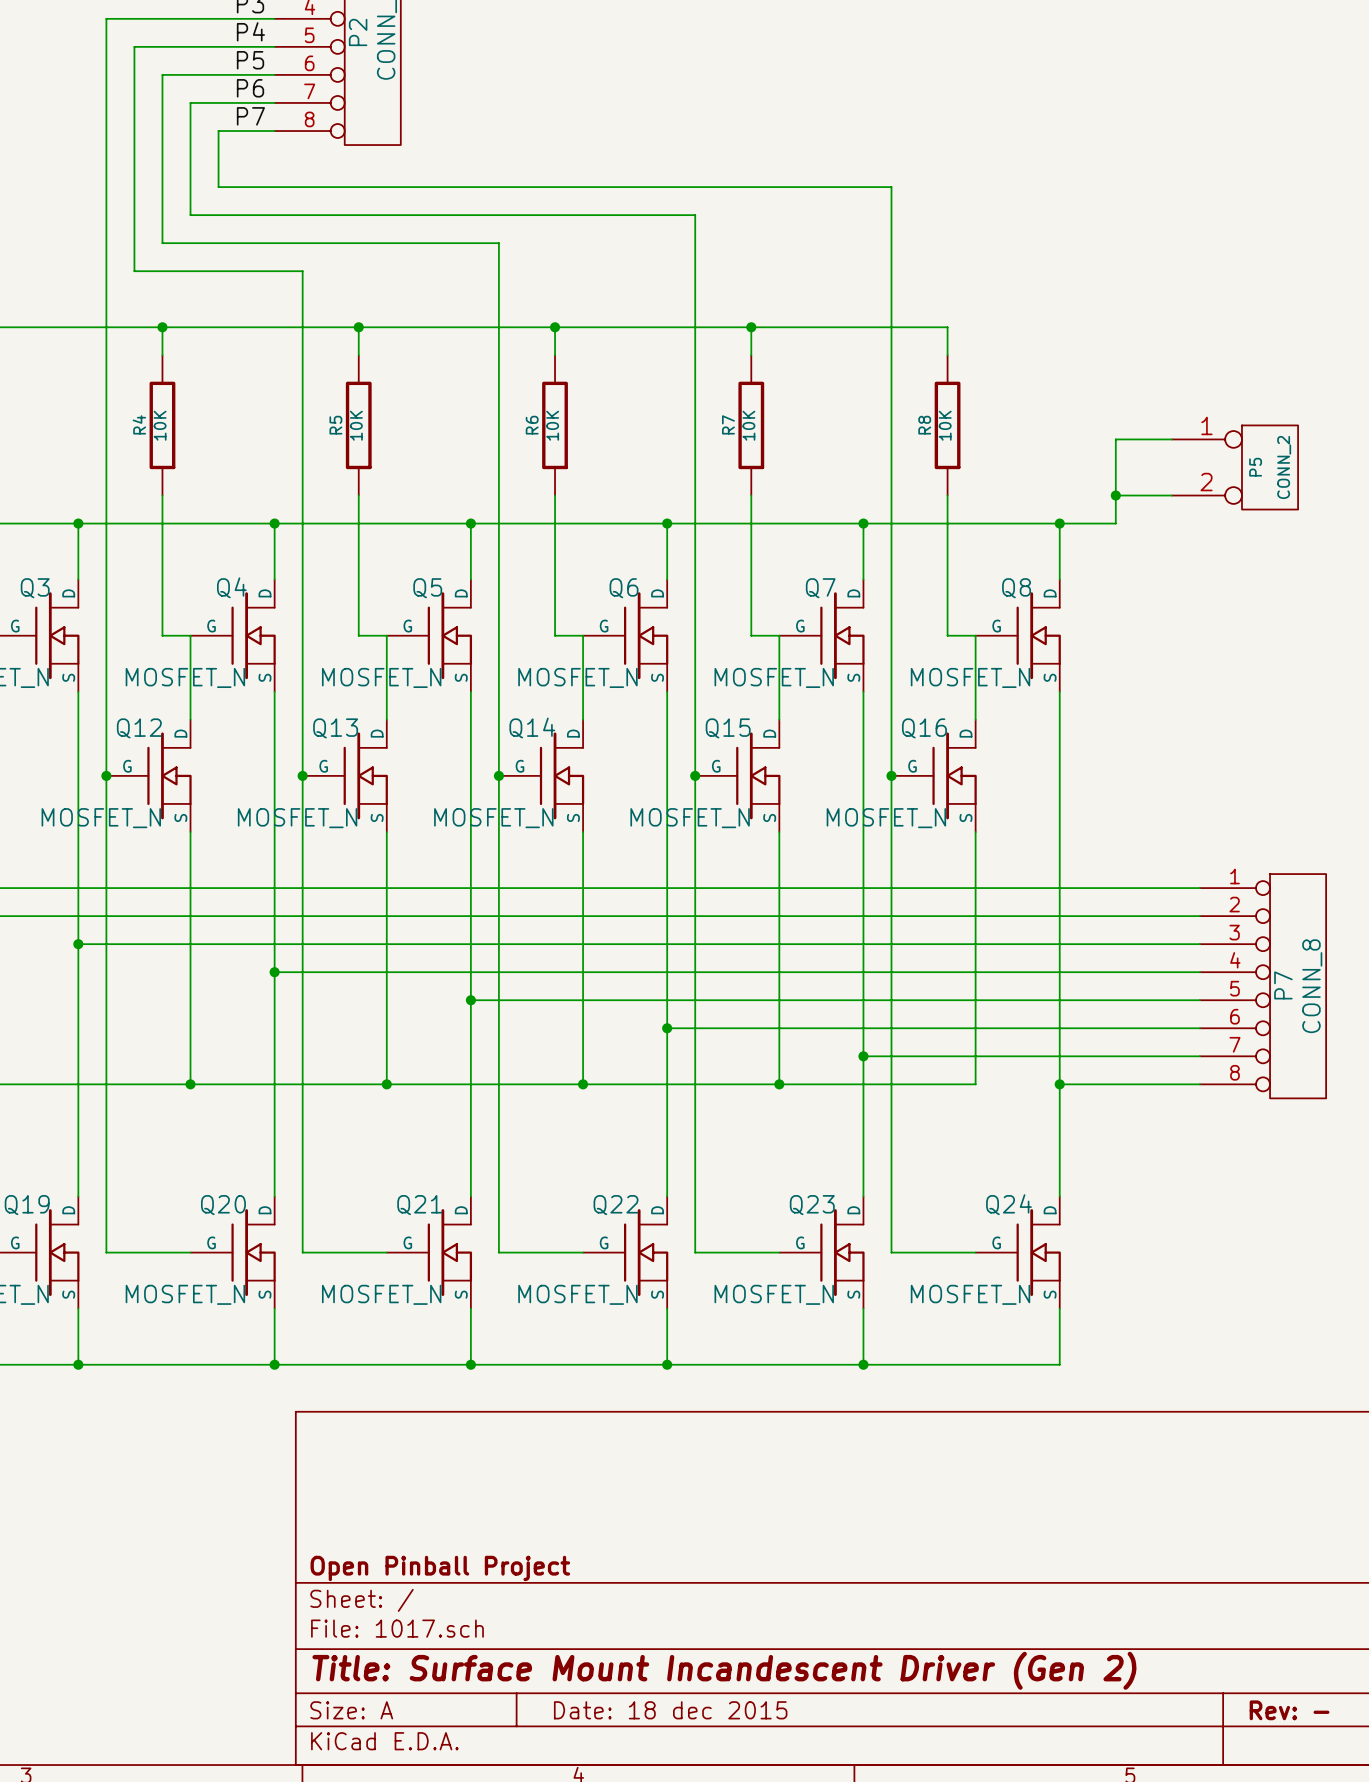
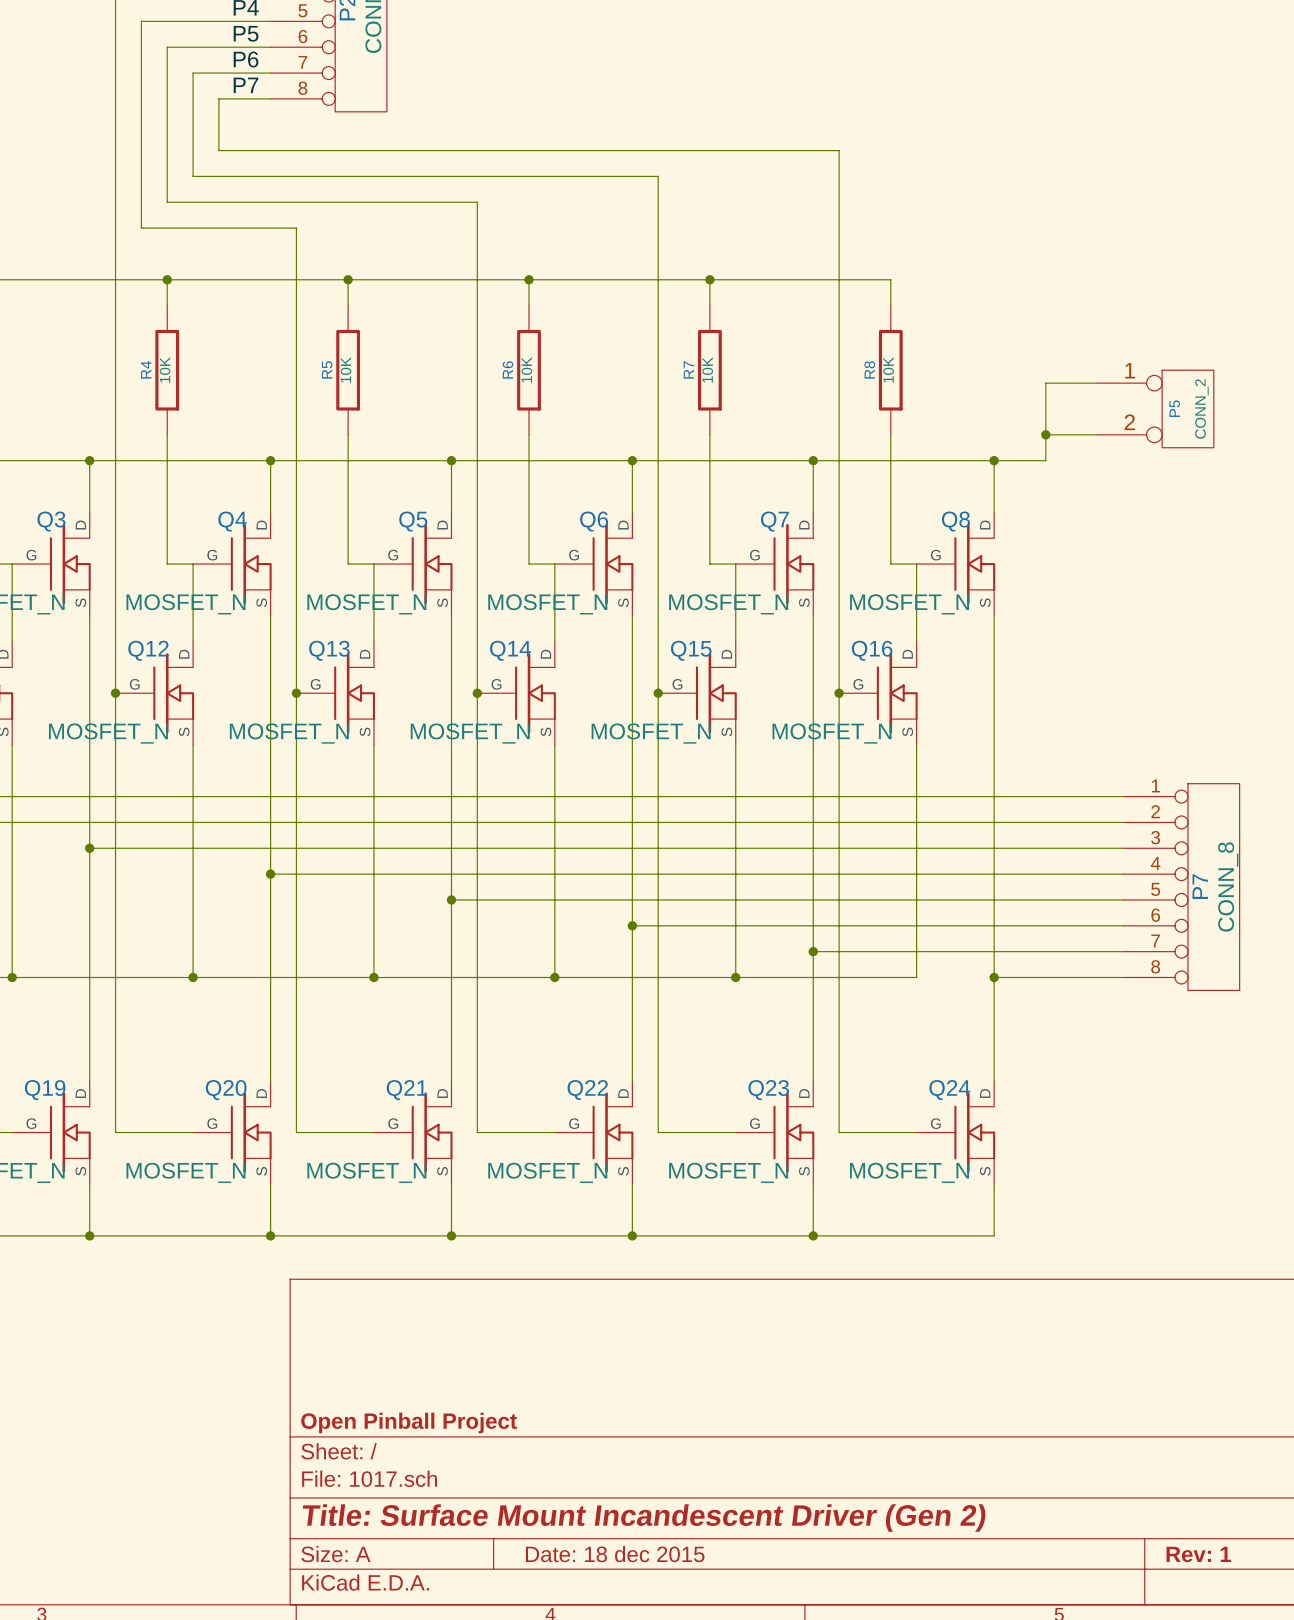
title block: Rev: - (1289, 1710) -> Rev: 1 (1198, 1554)

